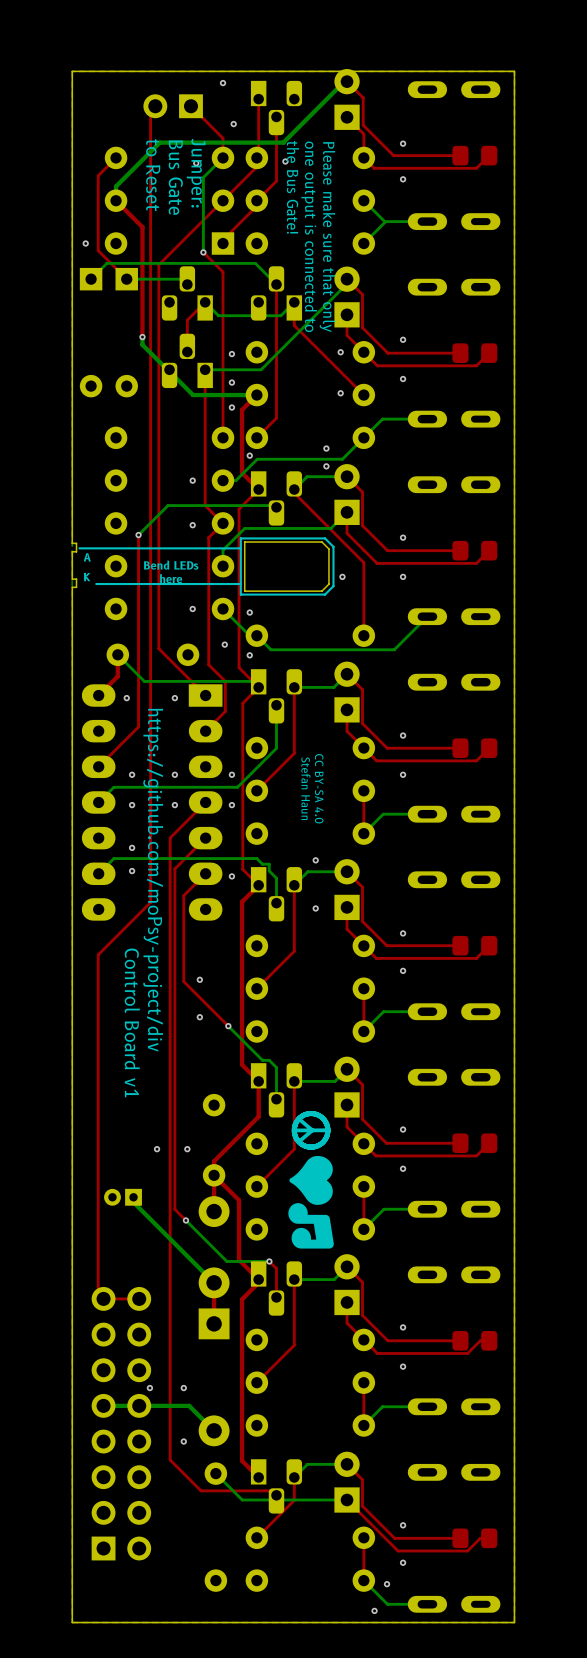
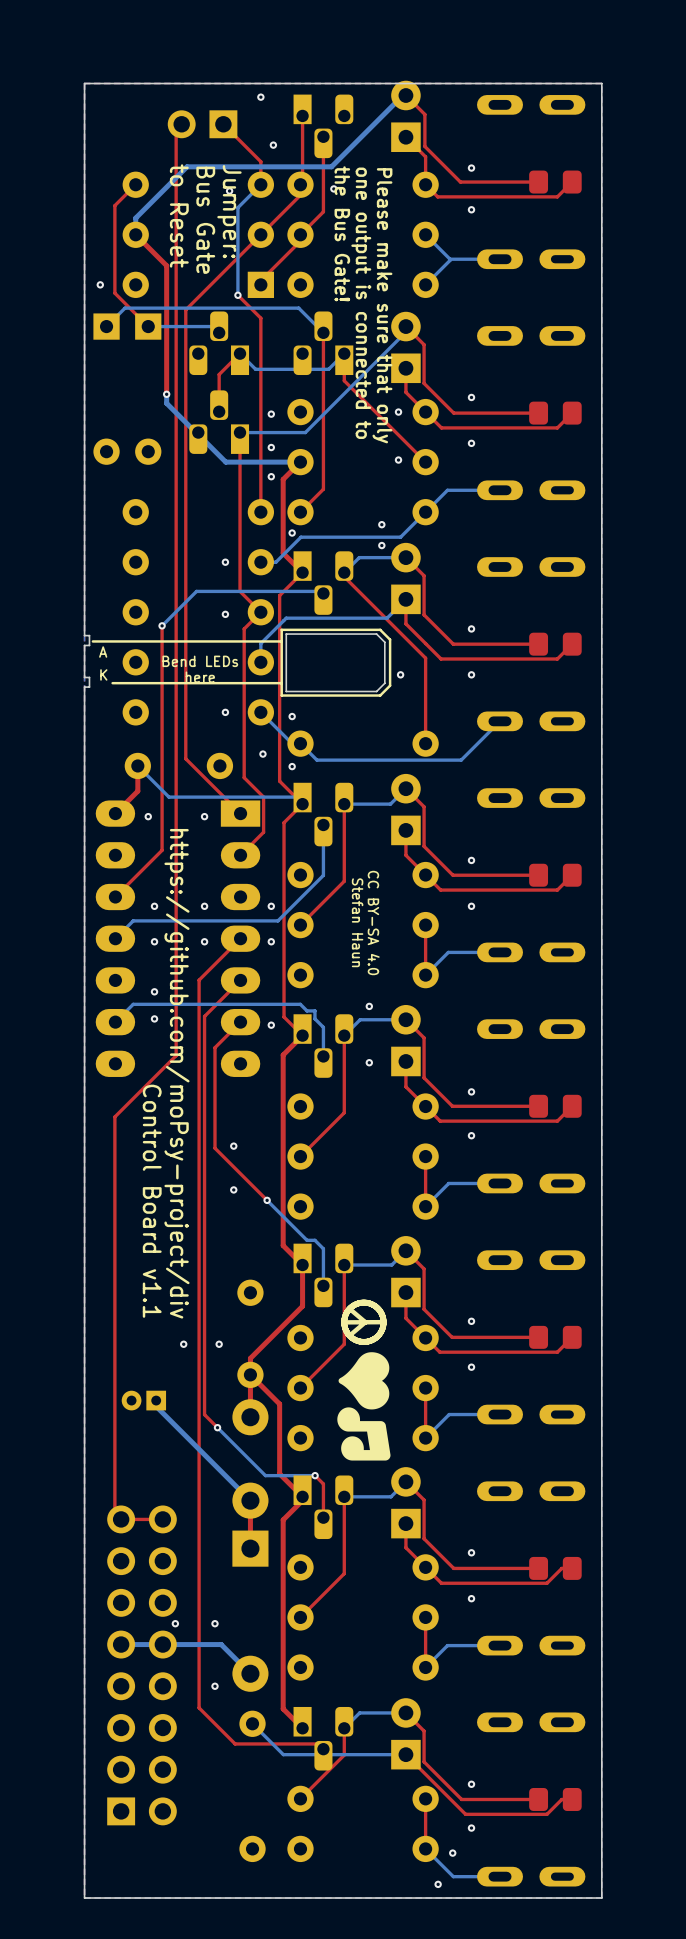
text: https://github.com/moPsy-project/div (153, 880) -> none
text: none -> https://github.com/moPsy-project/div (176, 1073)
text: Control Board v1 (132, 1022) -> Control Board v1.1 (152, 1201)

